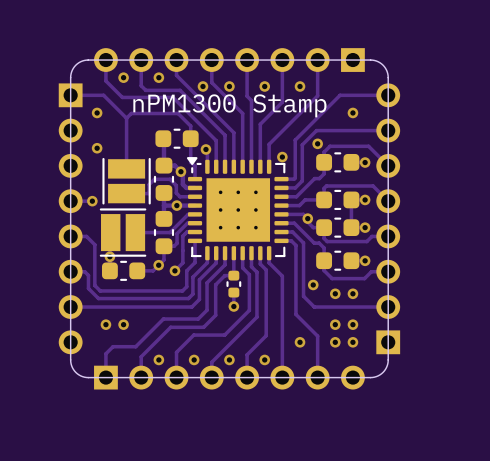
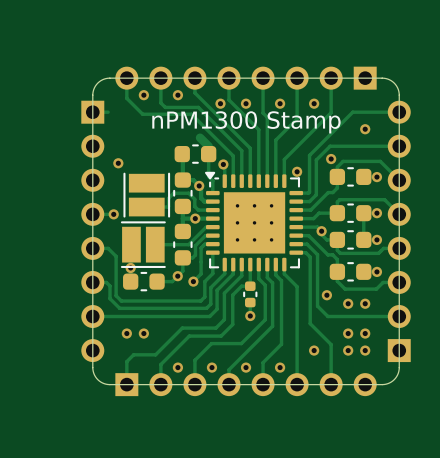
track: (86, 95) (103, 95) (126, 118) -> none
via: (97, 112) -> none
track: (126, 118) (131, 113) (178, 113) (190, 126) (190, 130) -> (200, 137) (208, 146)
track: (126, 118) (126, 168) -> none

